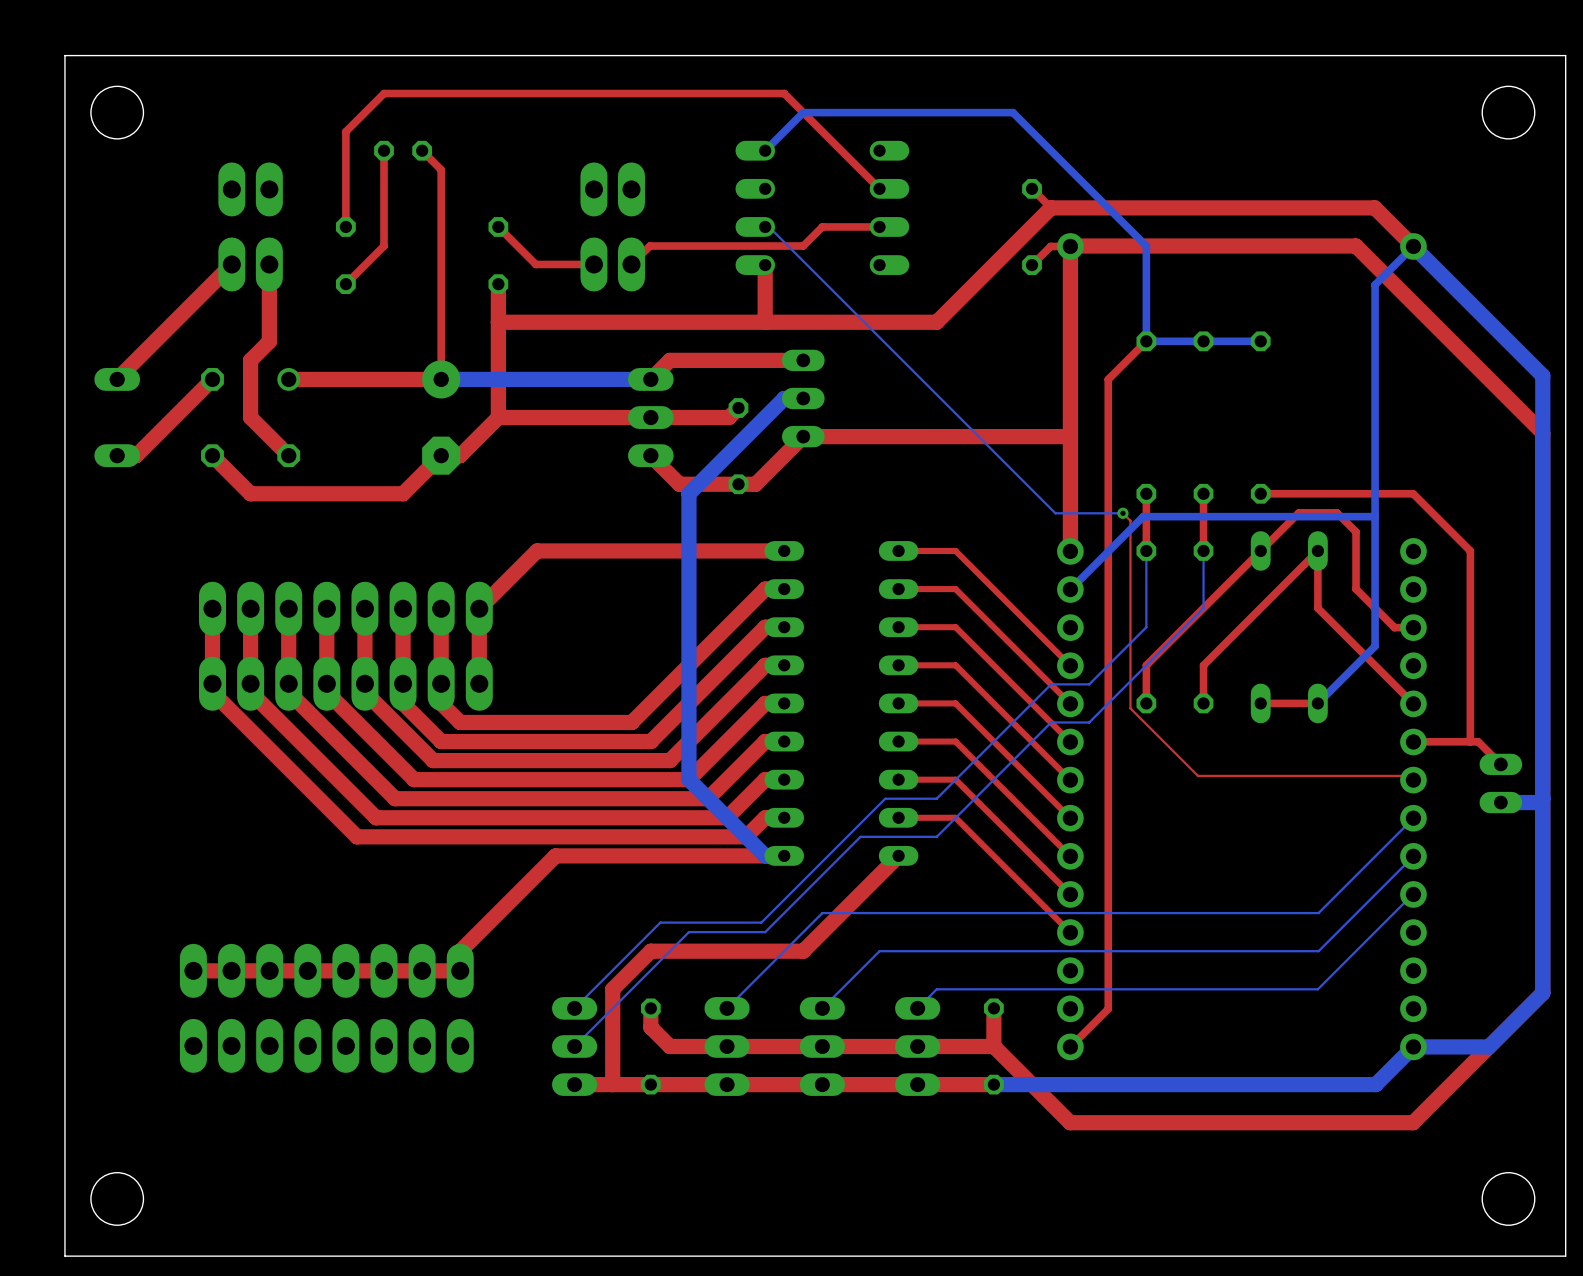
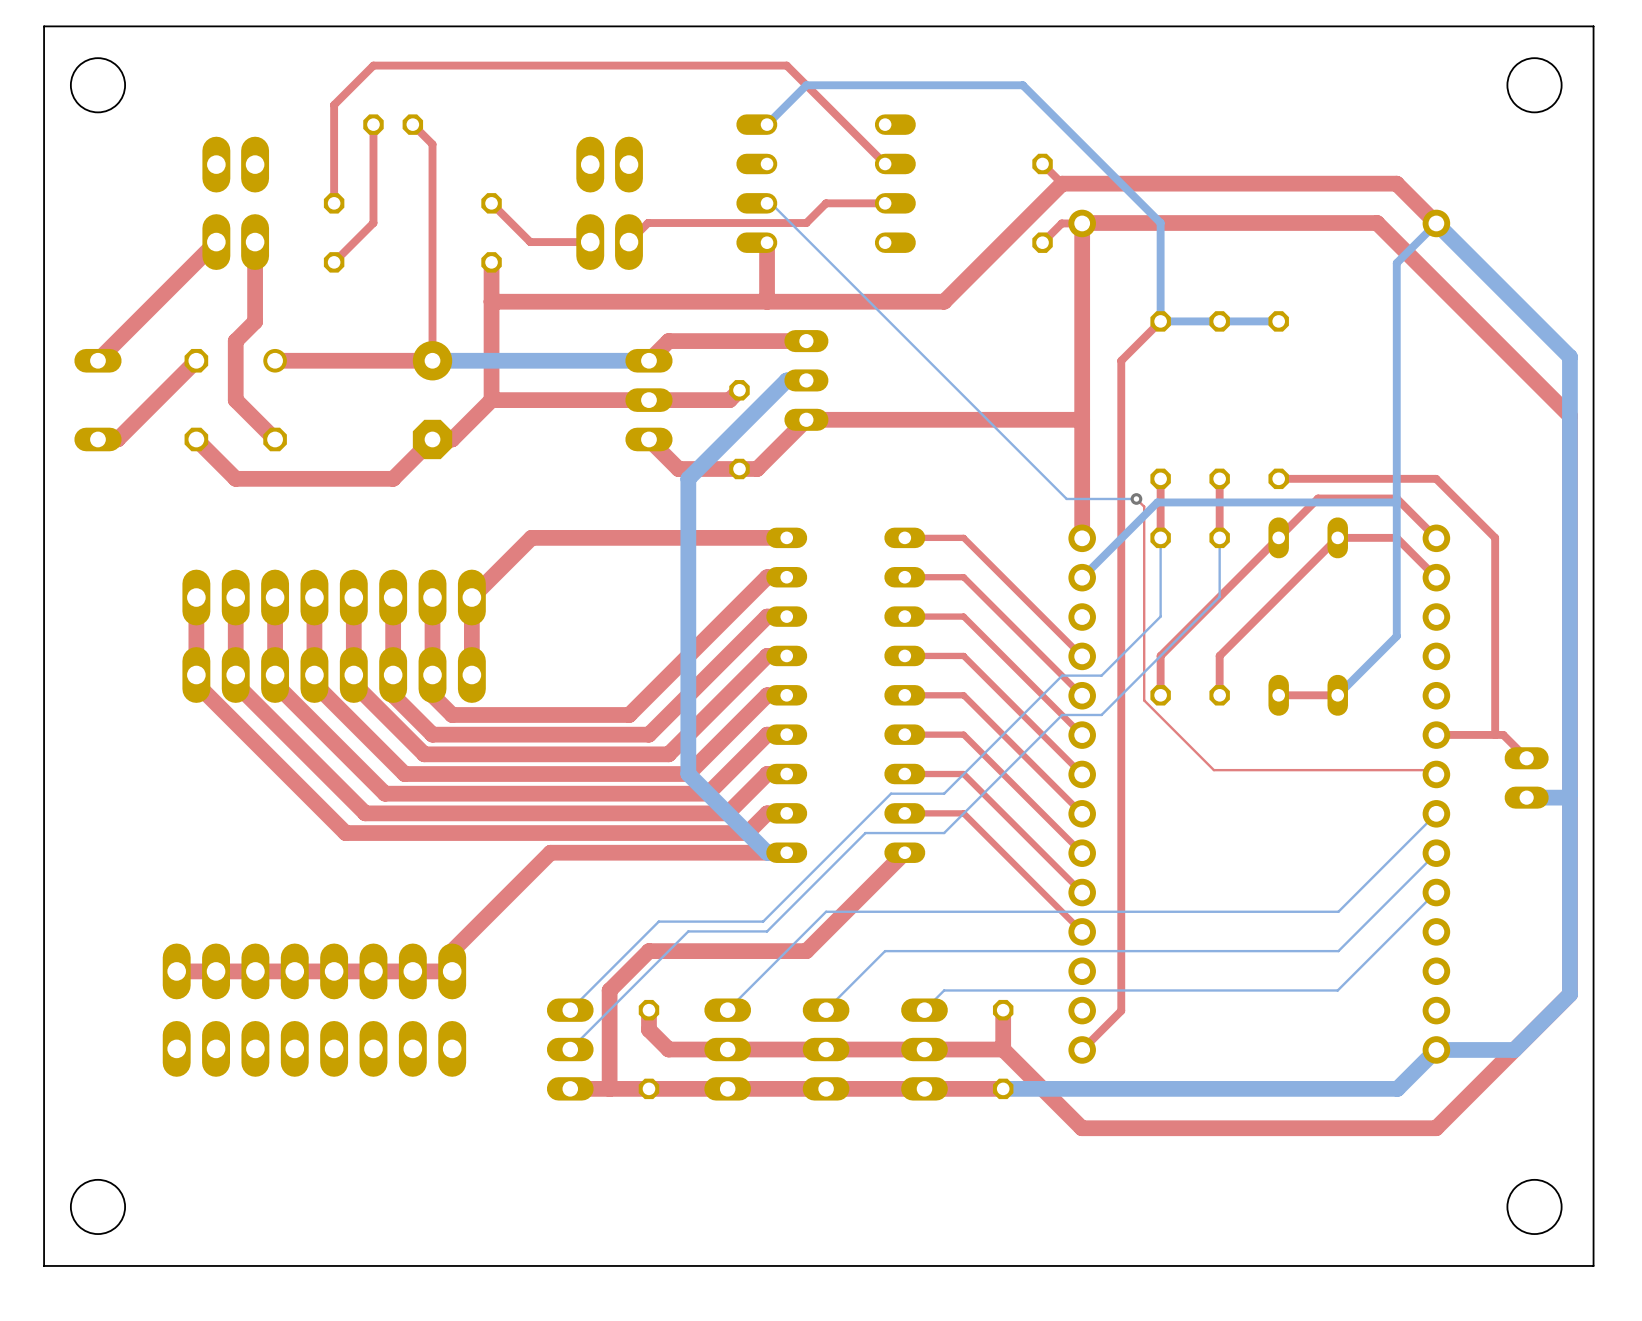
top track: (1336, 512) (1356, 531) (1356, 589) (1394, 627) (1413, 627) -> (1357, 498) (1396, 498) (1436, 538)
top track: (1317, 550) (1317, 608) (1413, 703) -> (1337, 537) (1396, 537) (1436, 577)

